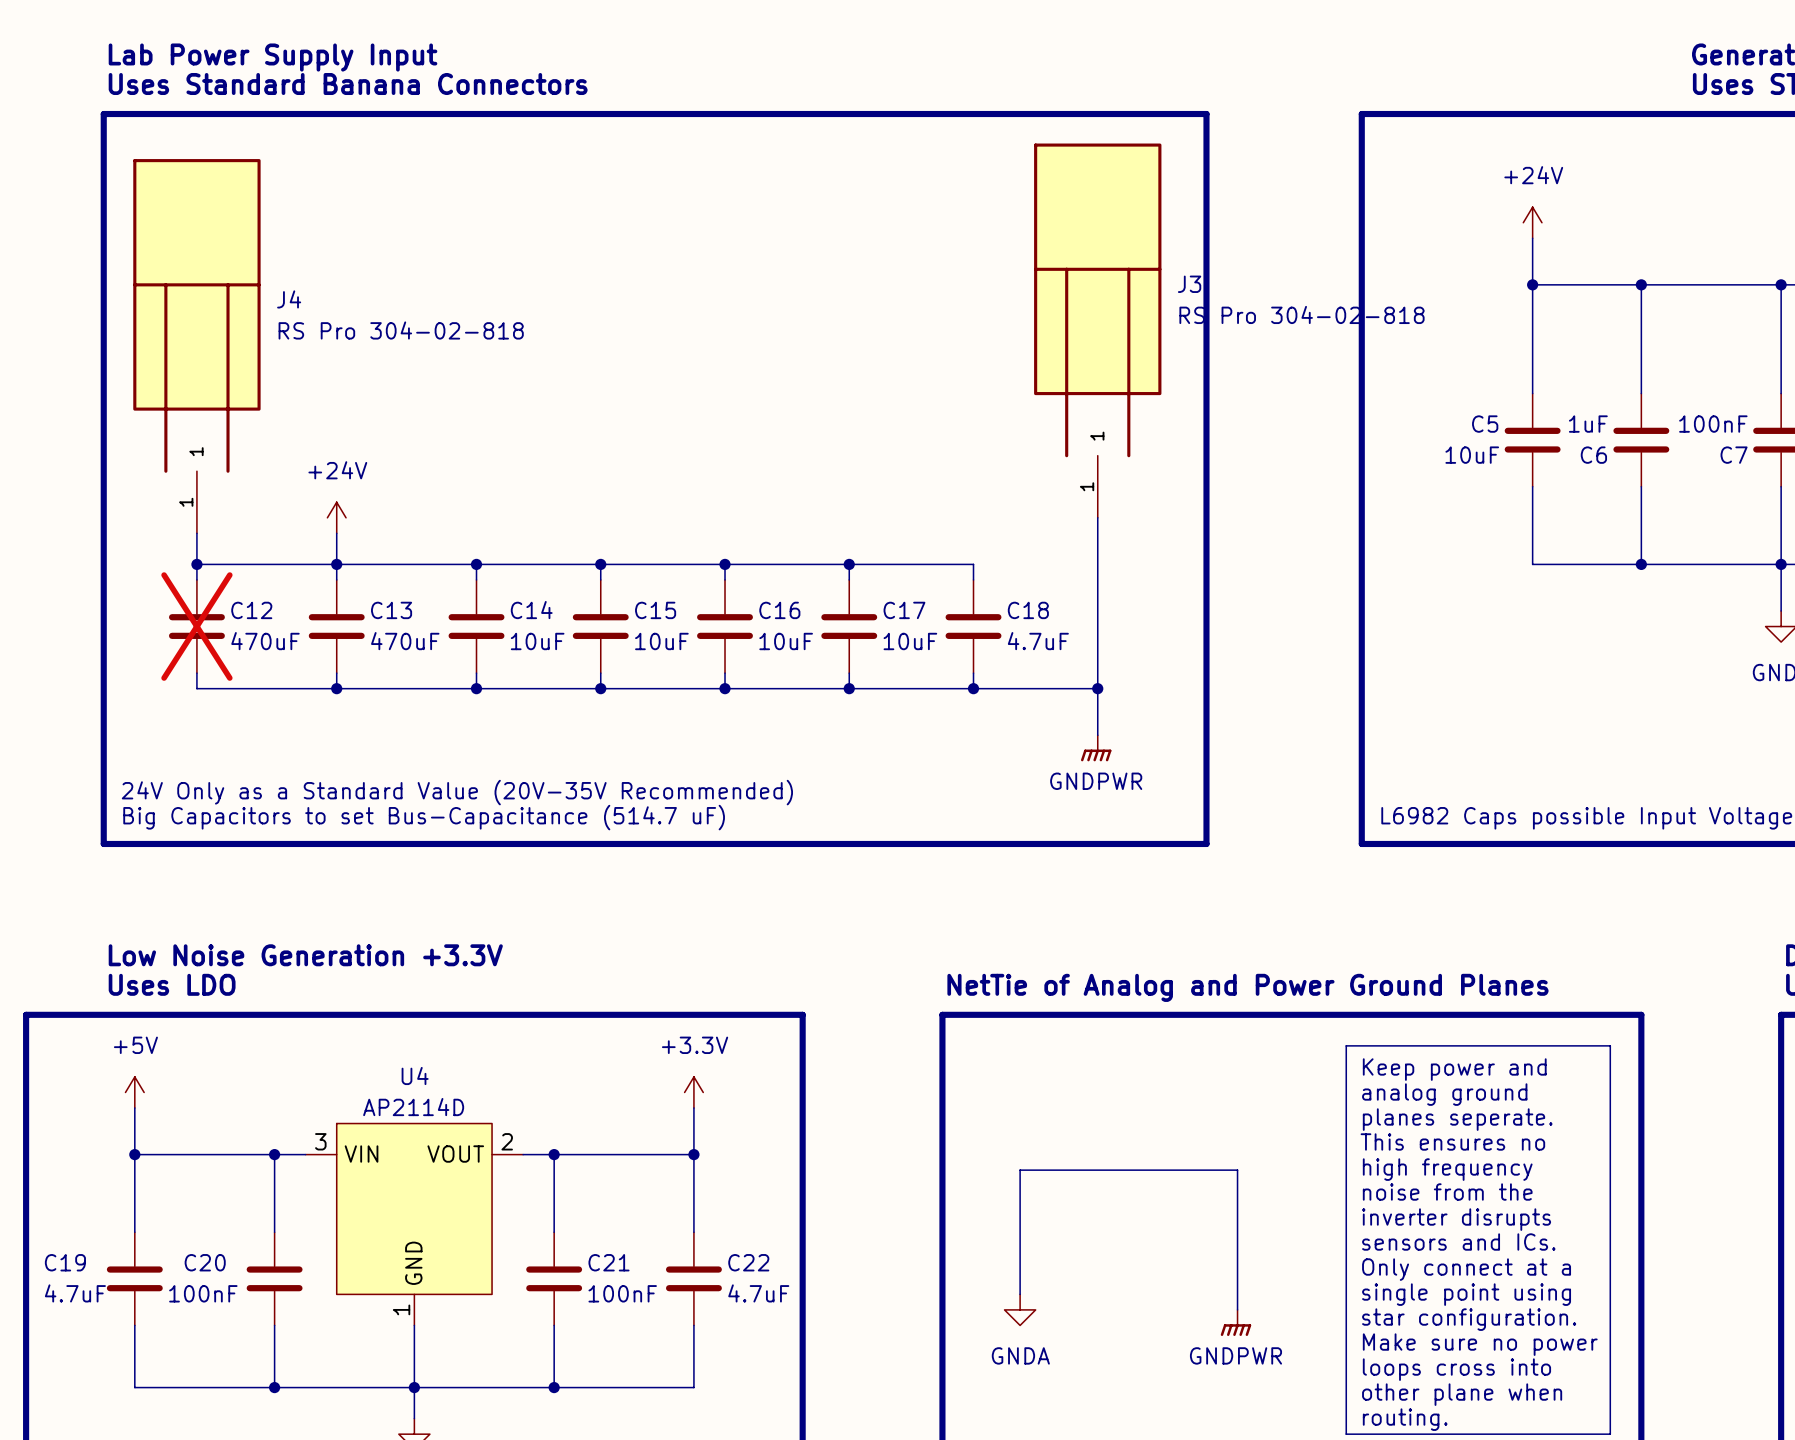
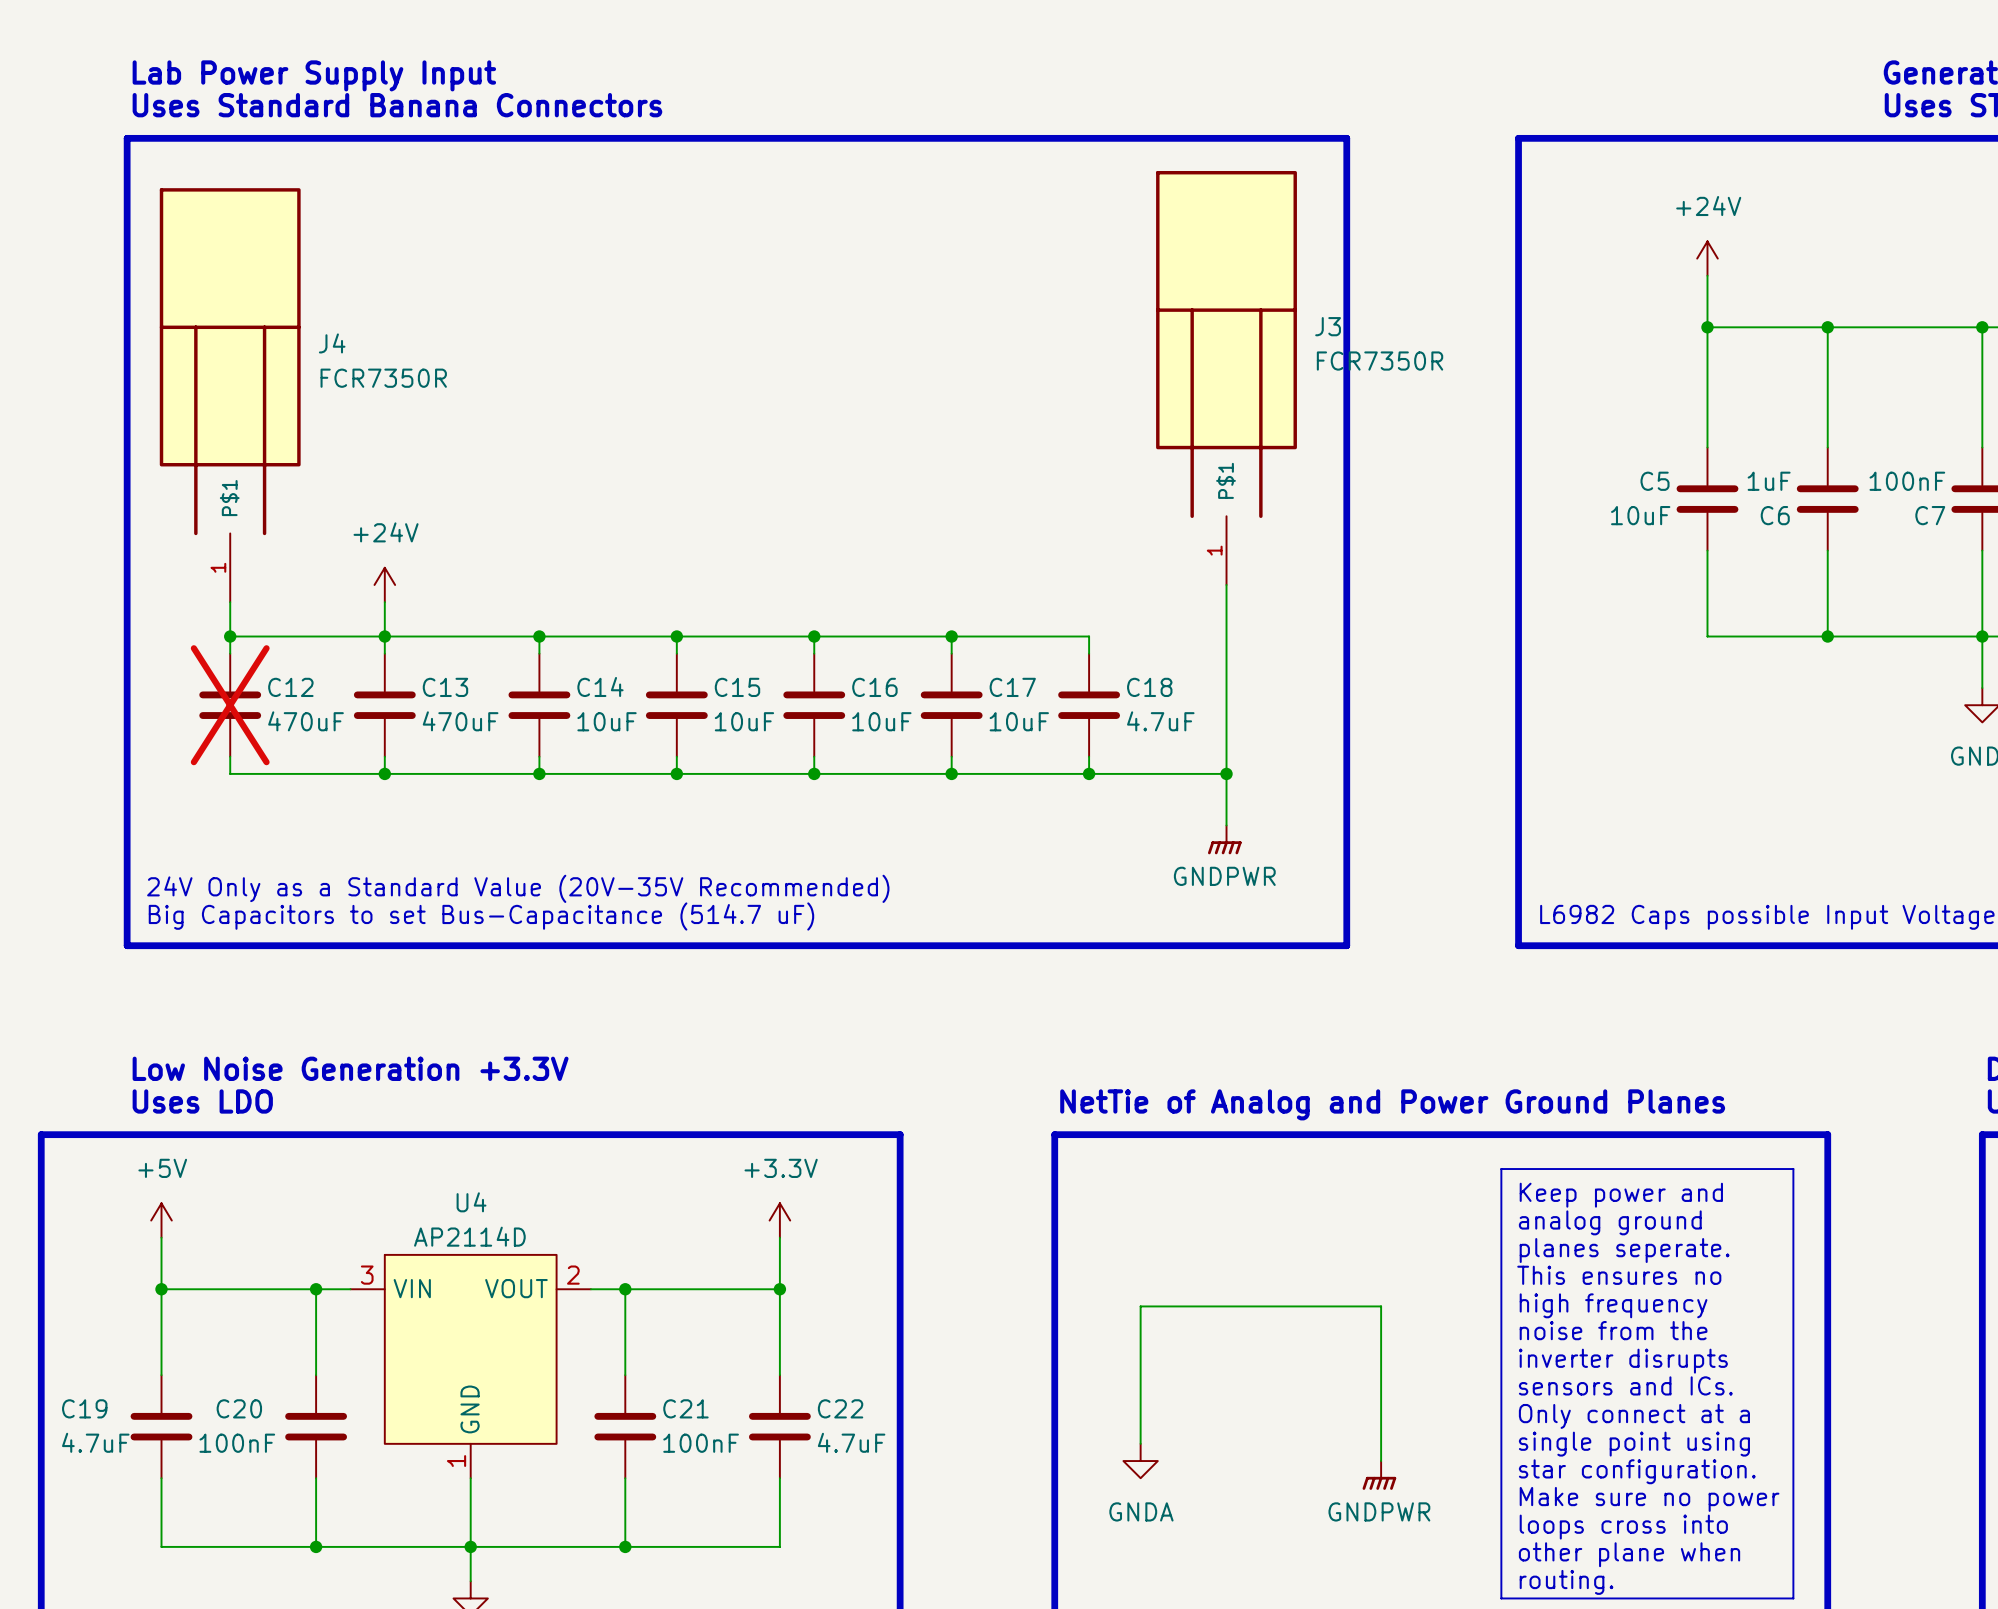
J3 value: RS Pro 304-02-818 (1302, 314) -> FCR7350R (1380, 361)
J4 value: RS Pro 304-02-818 (401, 330) -> FCR7350R (383, 378)
J3 pin name: 1 (1097, 436) -> P$1 (1226, 480)
J4 pin name: 1 (196, 451) -> P$1 (229, 498)

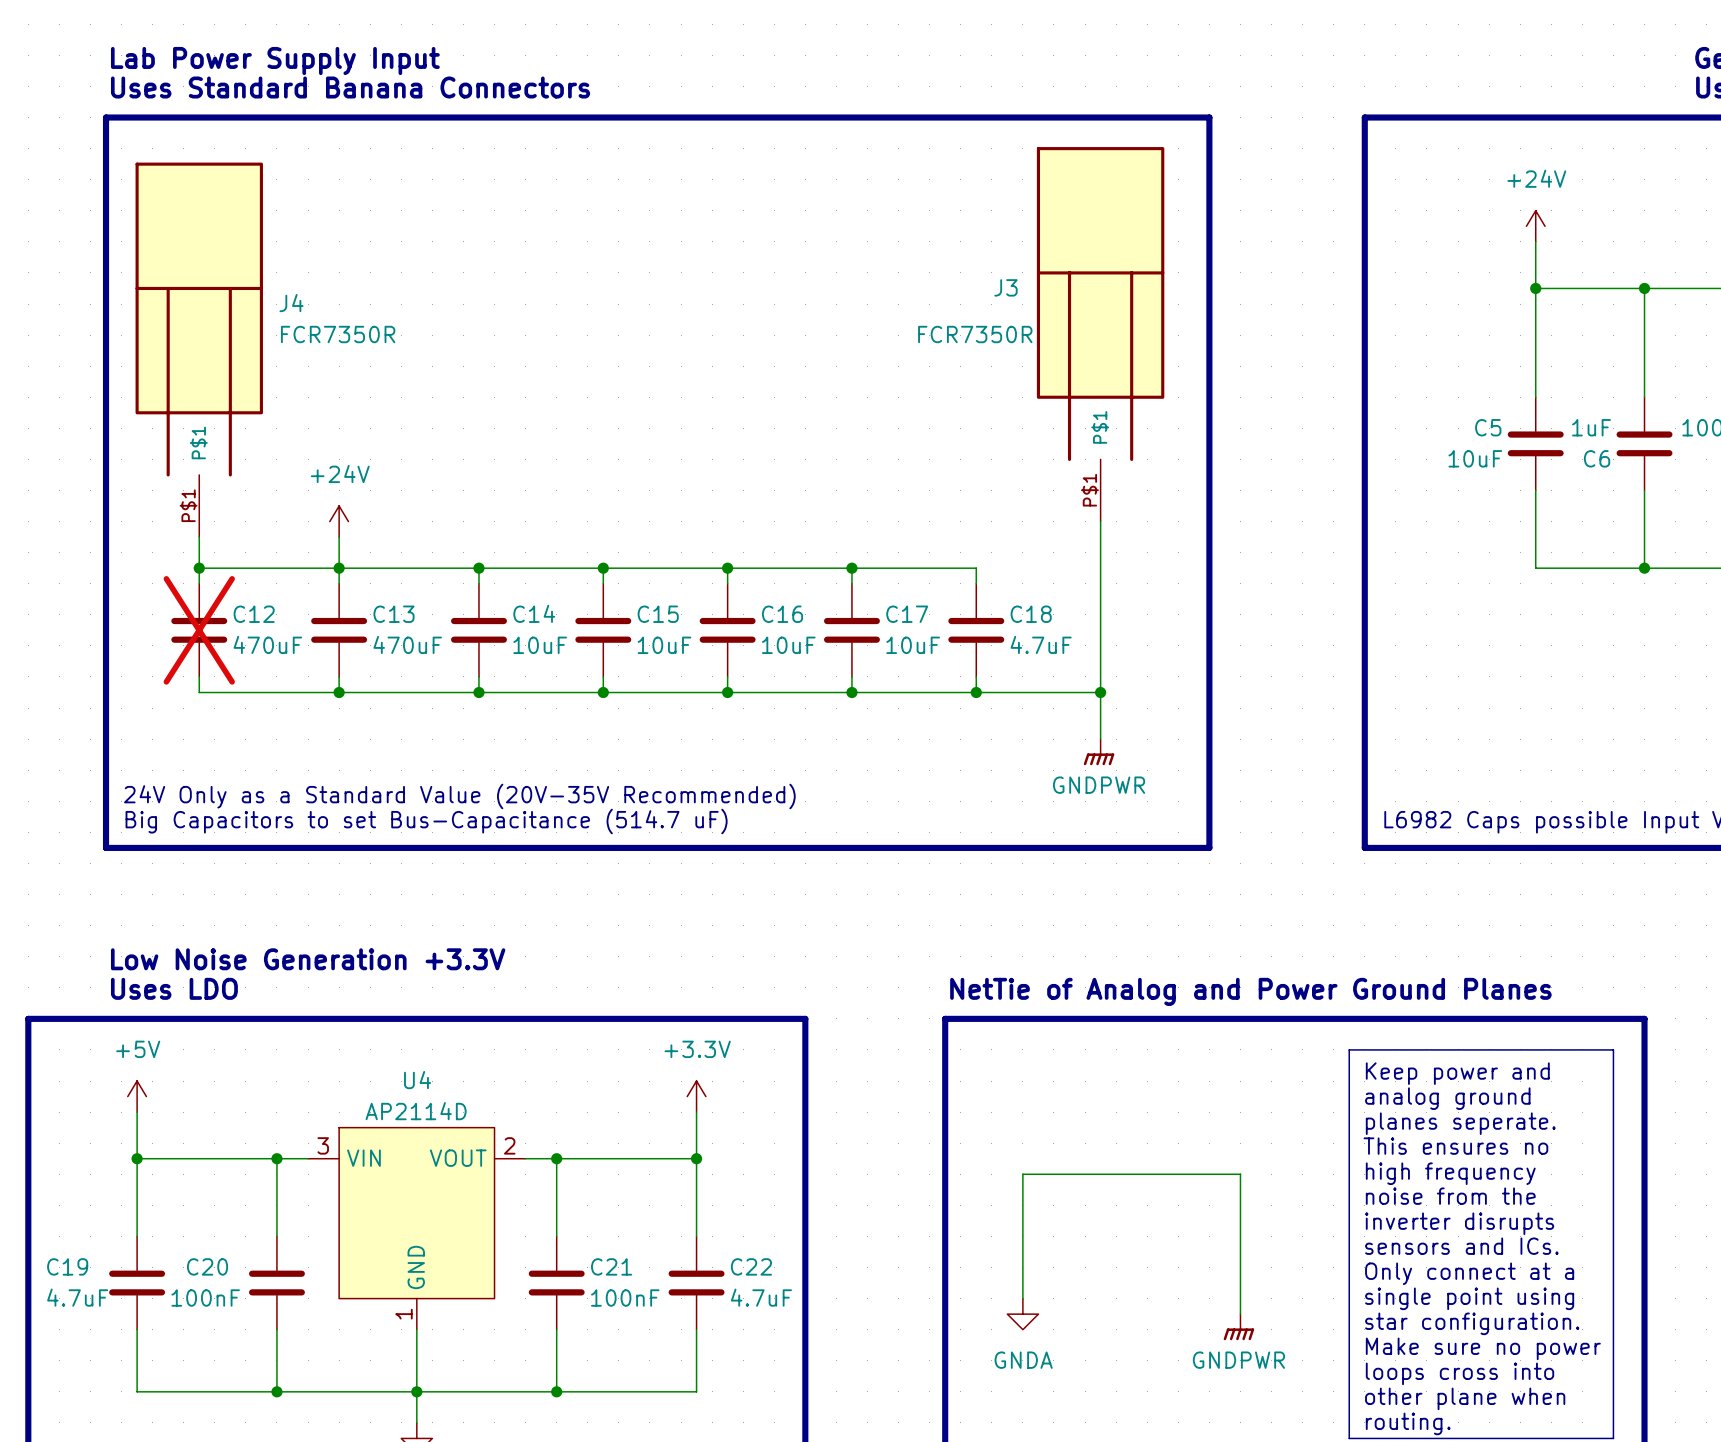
J3 name position: J3 (1328, 326) -> J3 (1006, 287)
J3 value position: FCR7350R (1380, 361) -> FCR7350R (975, 334)
J3 pin number: 1 (1214, 550) -> P$1 (1089, 490)
J4 pin number: 1 (218, 567) -> P$1 (188, 505)

